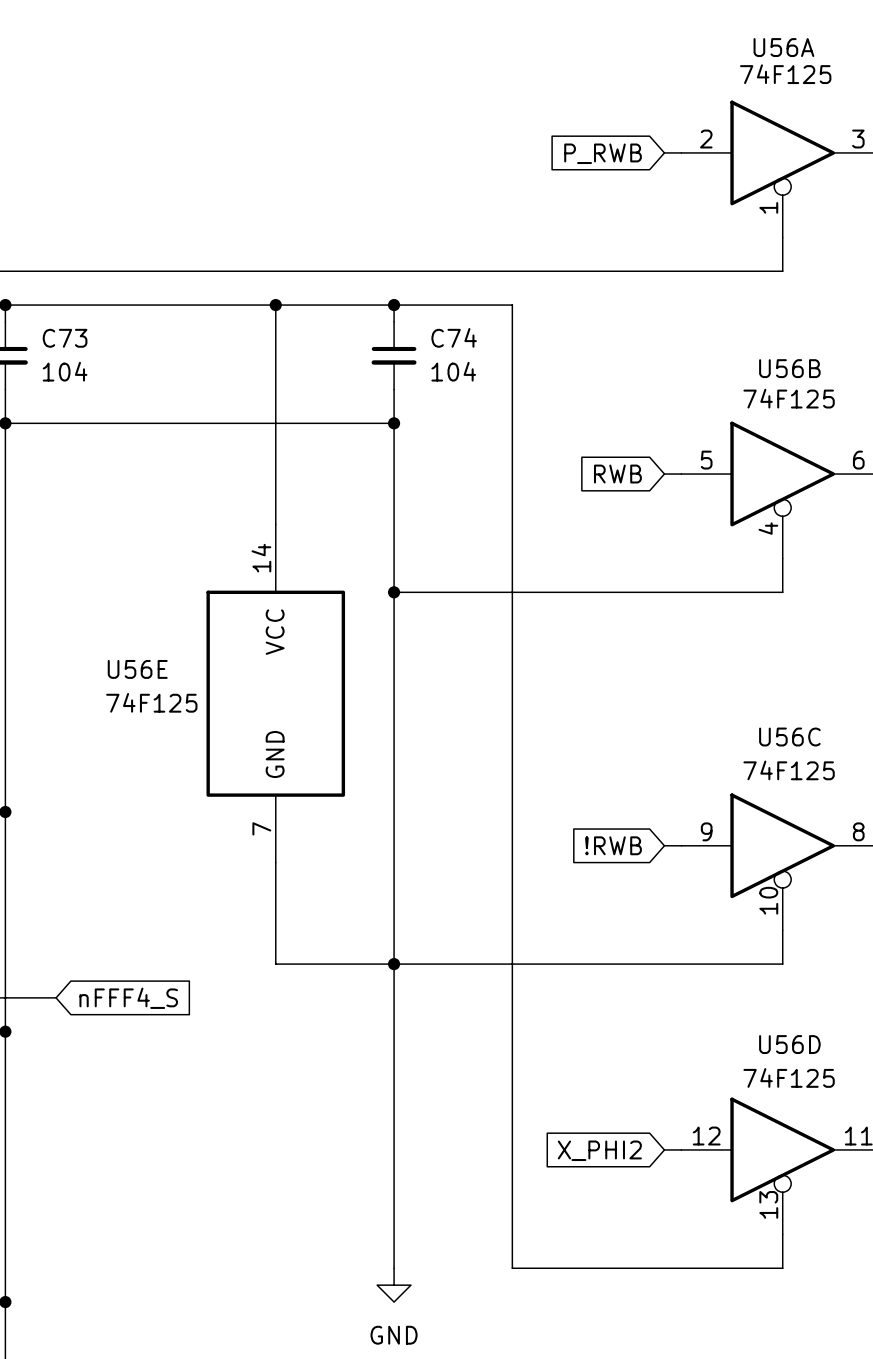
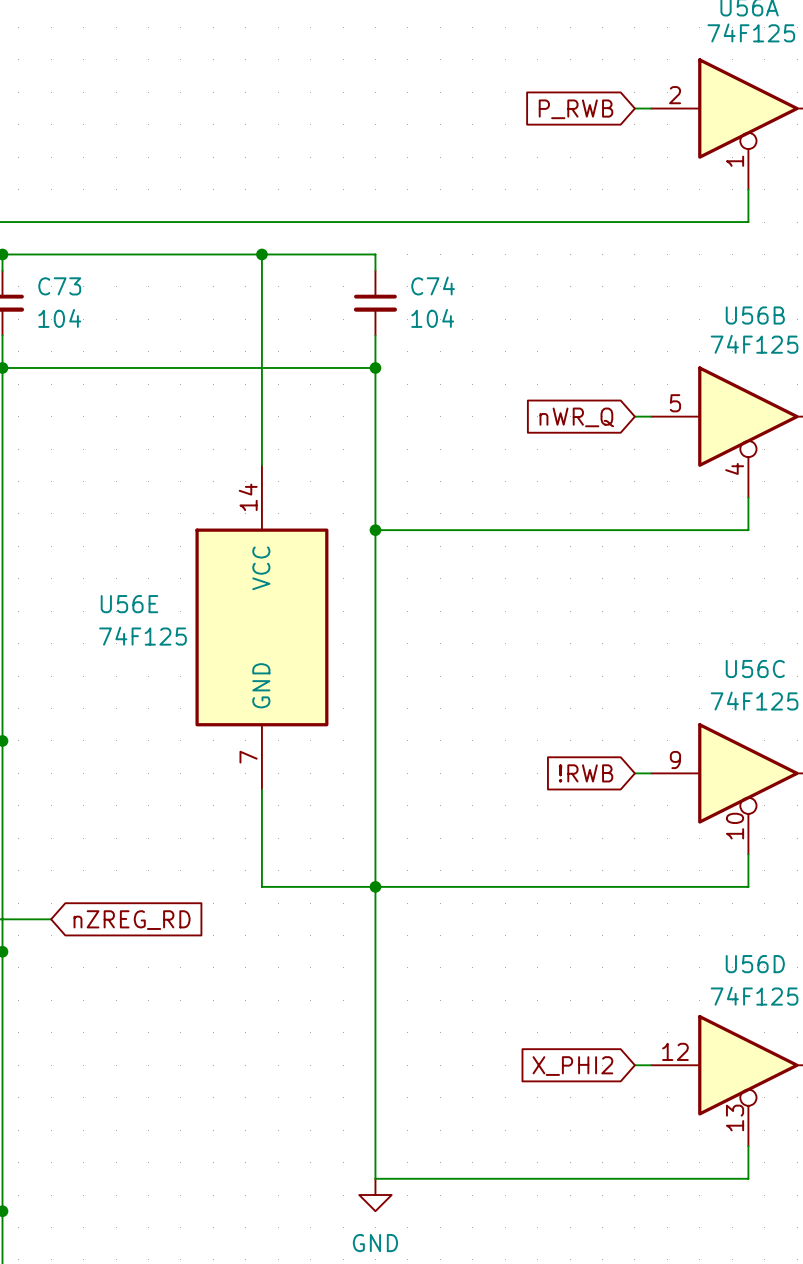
wire: (394, 305) (512, 305) (512, 1268) -> (375, 1178) (488, 1178)
junction: (394, 305) -> none
global label: RWB (617, 474) -> nWR_Q (576, 417)
global label: nFFF4_S (128, 998) -> nZREG_RD (132, 920)

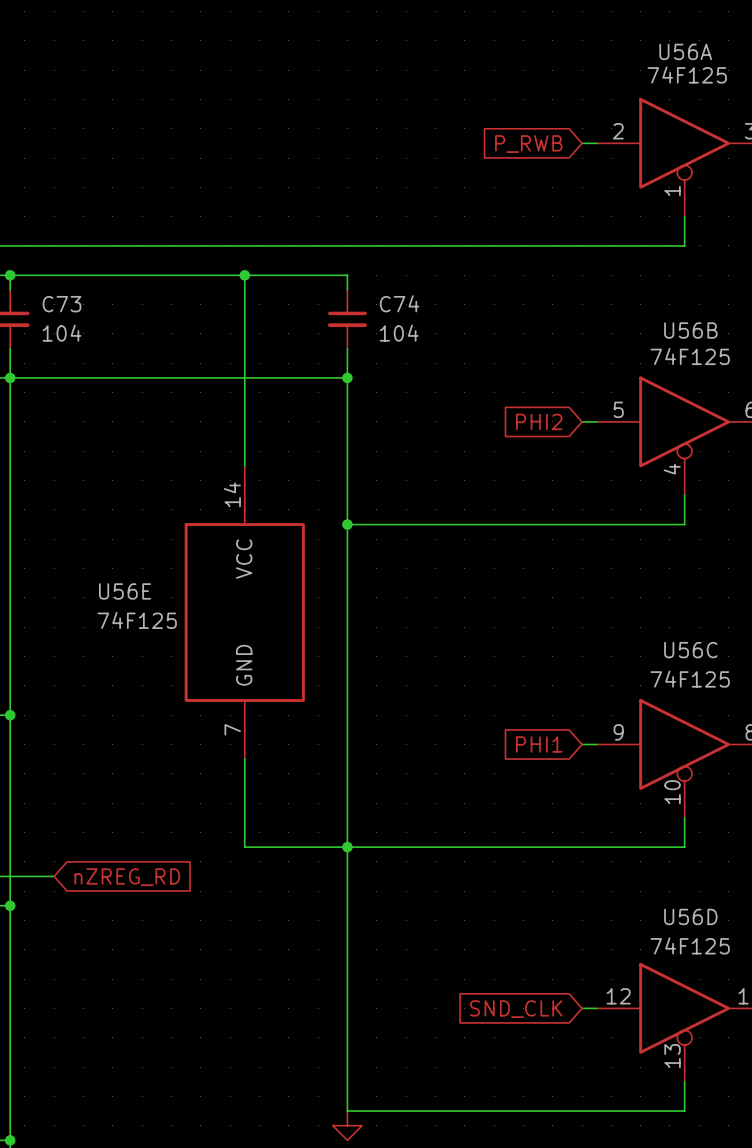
global label: nWR_Q (576, 417) -> PHI2 (539, 421)
global label: !RWB (586, 773) -> PHI1 (539, 744)
global label: X_PHI2 (572, 1066) -> SND_CLK (516, 1009)

